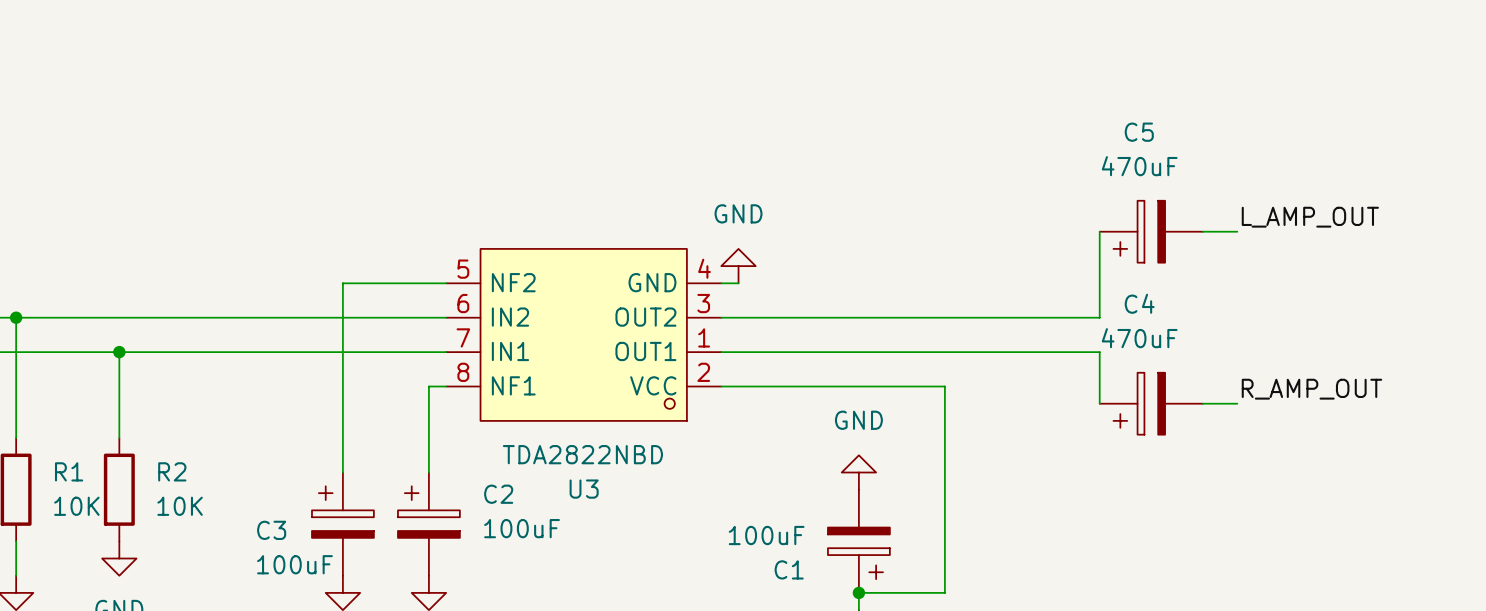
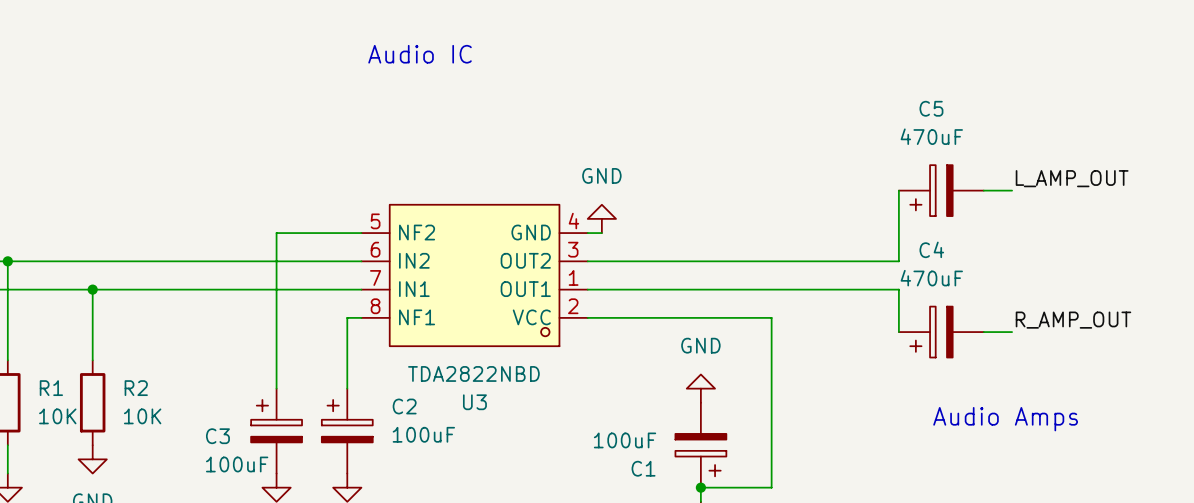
text: none -> Audio IC (420, 54)
text: none -> Audio Amps (1005, 419)

